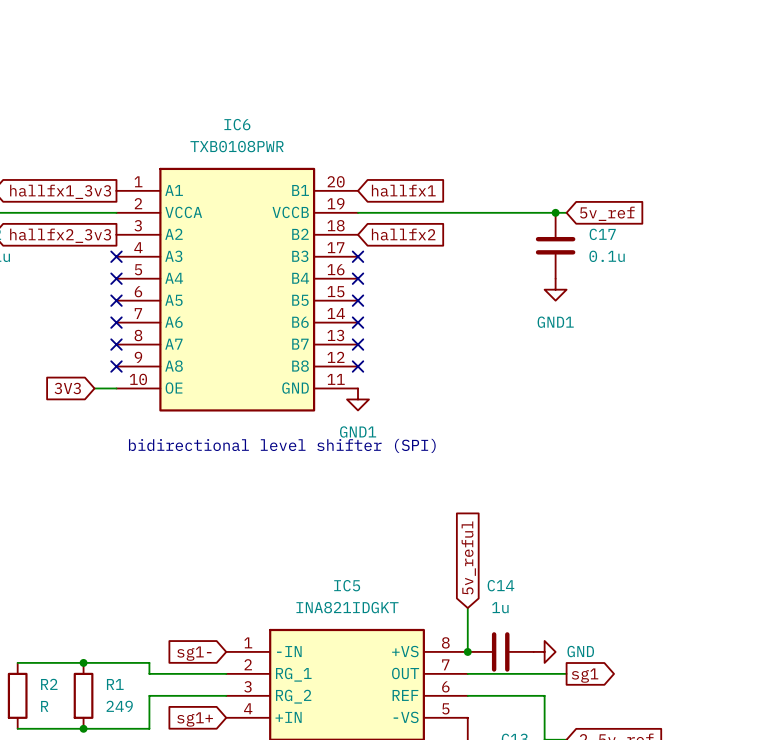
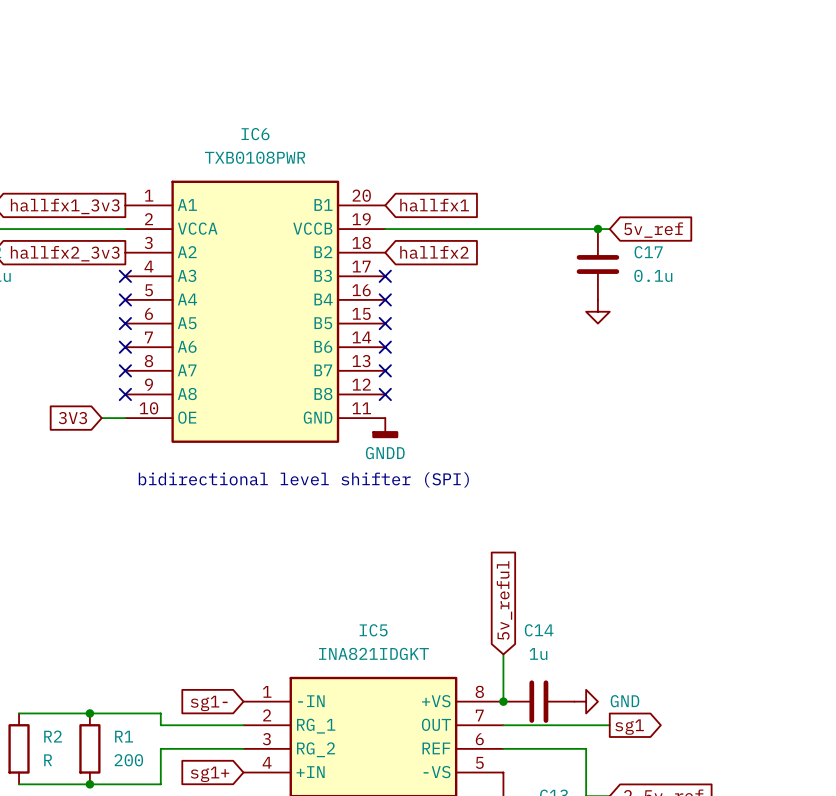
power symbol text: GND1 (555, 322) -> none
power symbol: GND1 (358, 399) -> GNDD (385, 428)
R1 value: 249 (119, 706) -> 200 (128, 760)

